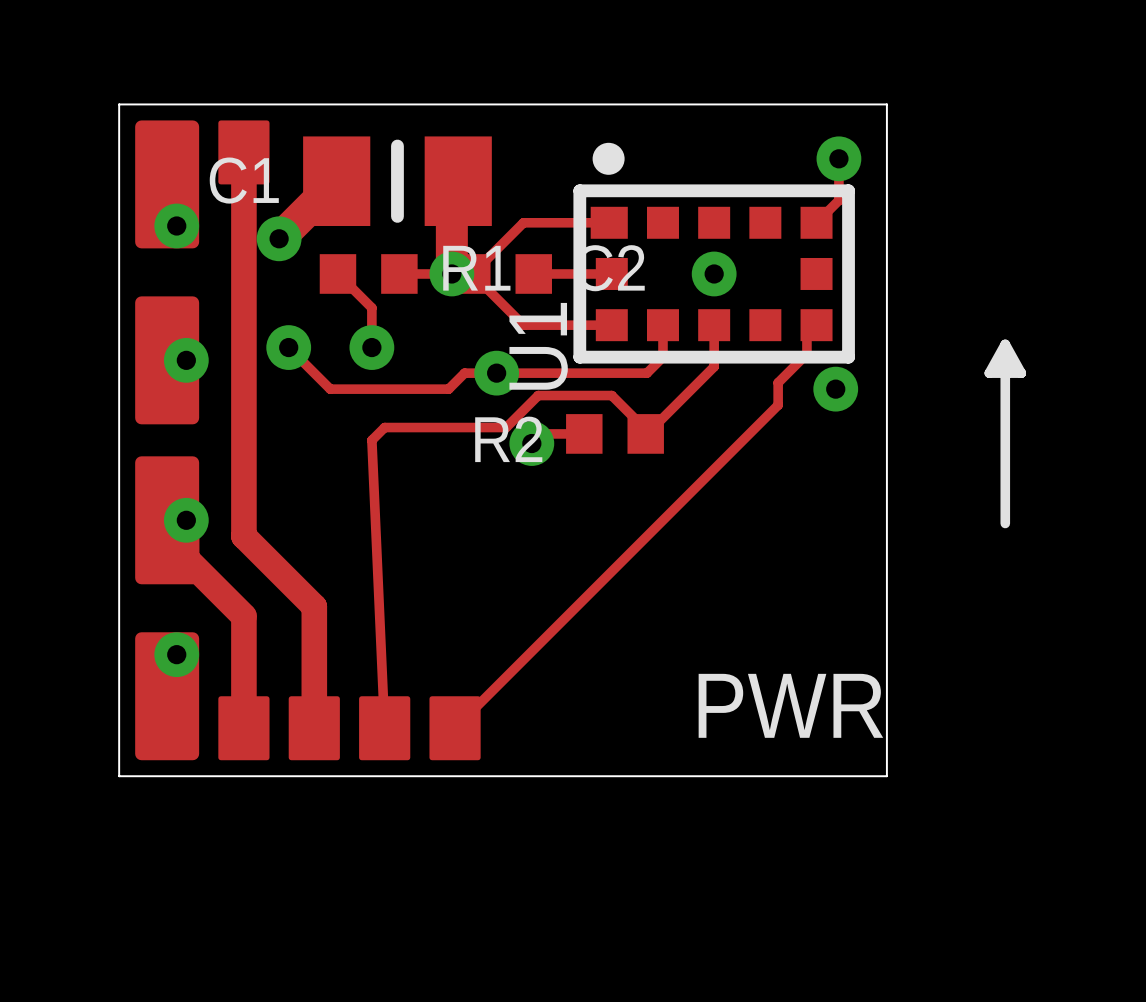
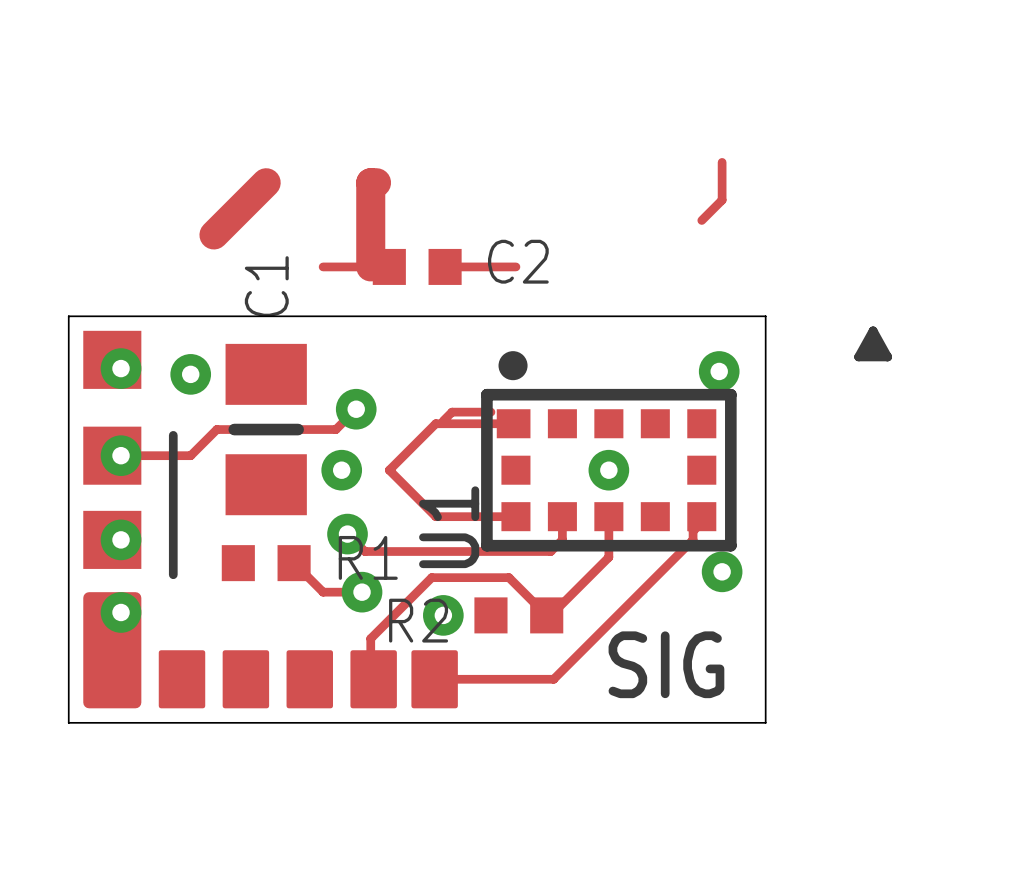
track: (243, 152) (243, 536) (314, 606) (314, 728) -> none
part position: (243, 152) -> (434, 679)
drawing position: (608, 158) -> (513, 365)
via: (838, 158) -> none
C1 rotation: 0° (397, 181) -> 90° clockwise (266, 429)
C1 position: (397, 181) -> (266, 429)
part: (167, 184) -> none
track: (609, 222) (523, 222) (472, 273) (523, 325) (611, 325) -> none
via: (176, 225) -> none
via: (279, 238) -> none
track: (337, 273) (371, 307) (371, 347) -> none
R1 position: (368, 273) -> (266, 563)
via: (451, 273) -> none
U1 position: (714, 273) -> (608, 470)
via: (714, 273) -> none
part footprint: [135, 296, 200, 425] -> [83, 330, 142, 389]
track: (662, 325) (662, 357) (646, 373) (464, 373) (448, 389) (330, 389) (288, 347) -> none
track: (714, 325) (714, 366) (646, 433) -> none
track: (816, 325) (806, 334) (806, 353) (778, 382) (778, 405) (455, 728) -> none
board edge: (119, 328) (119, 104) (886, 104) (886, 328) -> (68, 316) (765, 316)
via: (288, 347) -> none
via: (371, 347) -> none
via position: (186, 360) -> (121, 368)
line: (1005, 369) (1005, 523) -> (173, 435) (173, 574)
via: (496, 373) -> none
via: none -> (190, 374)
track: none -> (356, 409) (335, 429) (216, 429) (190, 455) (112, 455)
via: none -> (356, 409)
R2 position: (615, 433) -> (518, 615)
track: (645, 433) (645, 429) (611, 395) (538, 395) (506, 427) (384, 427) (371, 440) (384, 728) -> none
via: (531, 443) -> none
track: none -> (515, 423) (435, 423) (389, 470) (435, 516) (515, 516)
part: none -> (112, 455)
via: none -> (341, 470)
via: none -> (608, 470)
track: (167, 520) (186, 520) (186, 558) (243, 616) (243, 728) -> none
part: (167, 520) -> none
via position: (186, 520) -> (121, 455)
track: none -> (562, 516) (562, 539) (550, 551) (364, 551) (347, 534)
track: none -> (608, 516) (608, 557) (550, 615) (546, 615) (508, 577) (431, 577) (370, 638) (370, 679)
track: none -> (701, 516) (701, 522) (693, 531) (693, 539) (553, 679) (434, 679)
via: none -> (347, 534)
part: none -> (112, 539)
via: none -> (121, 539)
track: none -> (294, 563) (323, 592) (362, 592)
via: none -> (722, 571)
via: none -> (362, 592)
via: none -> (443, 615)
text: PWR (790, 705) -> SIG (666, 664)

